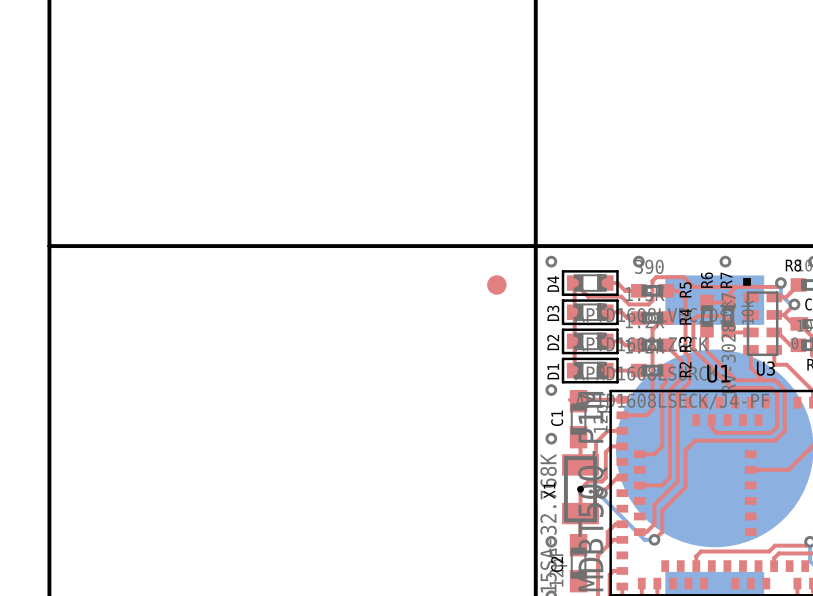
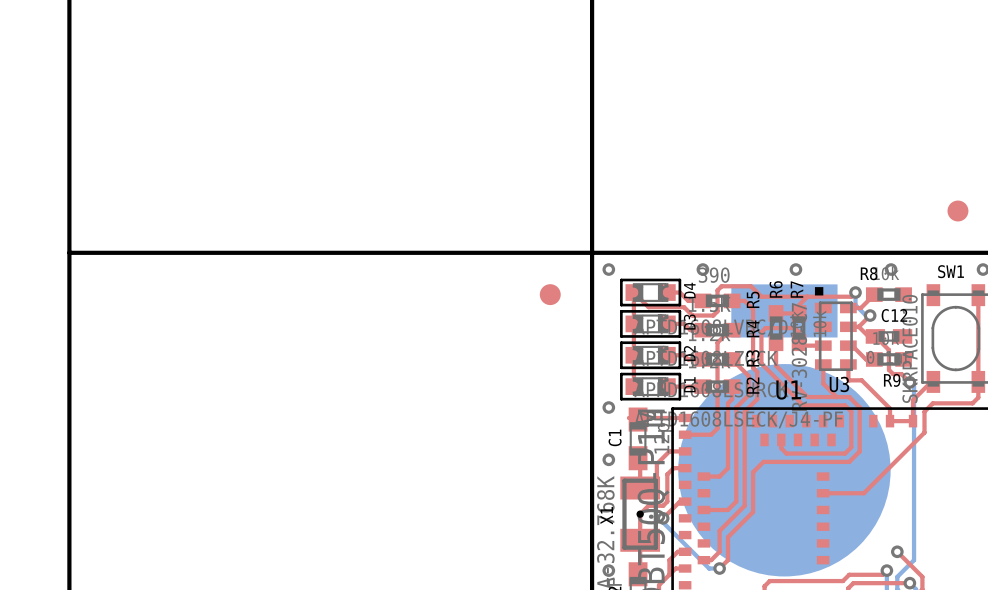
D4 name position: D4 (553, 283) -> D4 (689, 290)
D3 name position: D3 (553, 313) -> D3 (689, 322)
D2 name position: D2 (553, 342) -> D2 (689, 353)
D1 name position: D1 (553, 371) -> D1 (689, 384)

